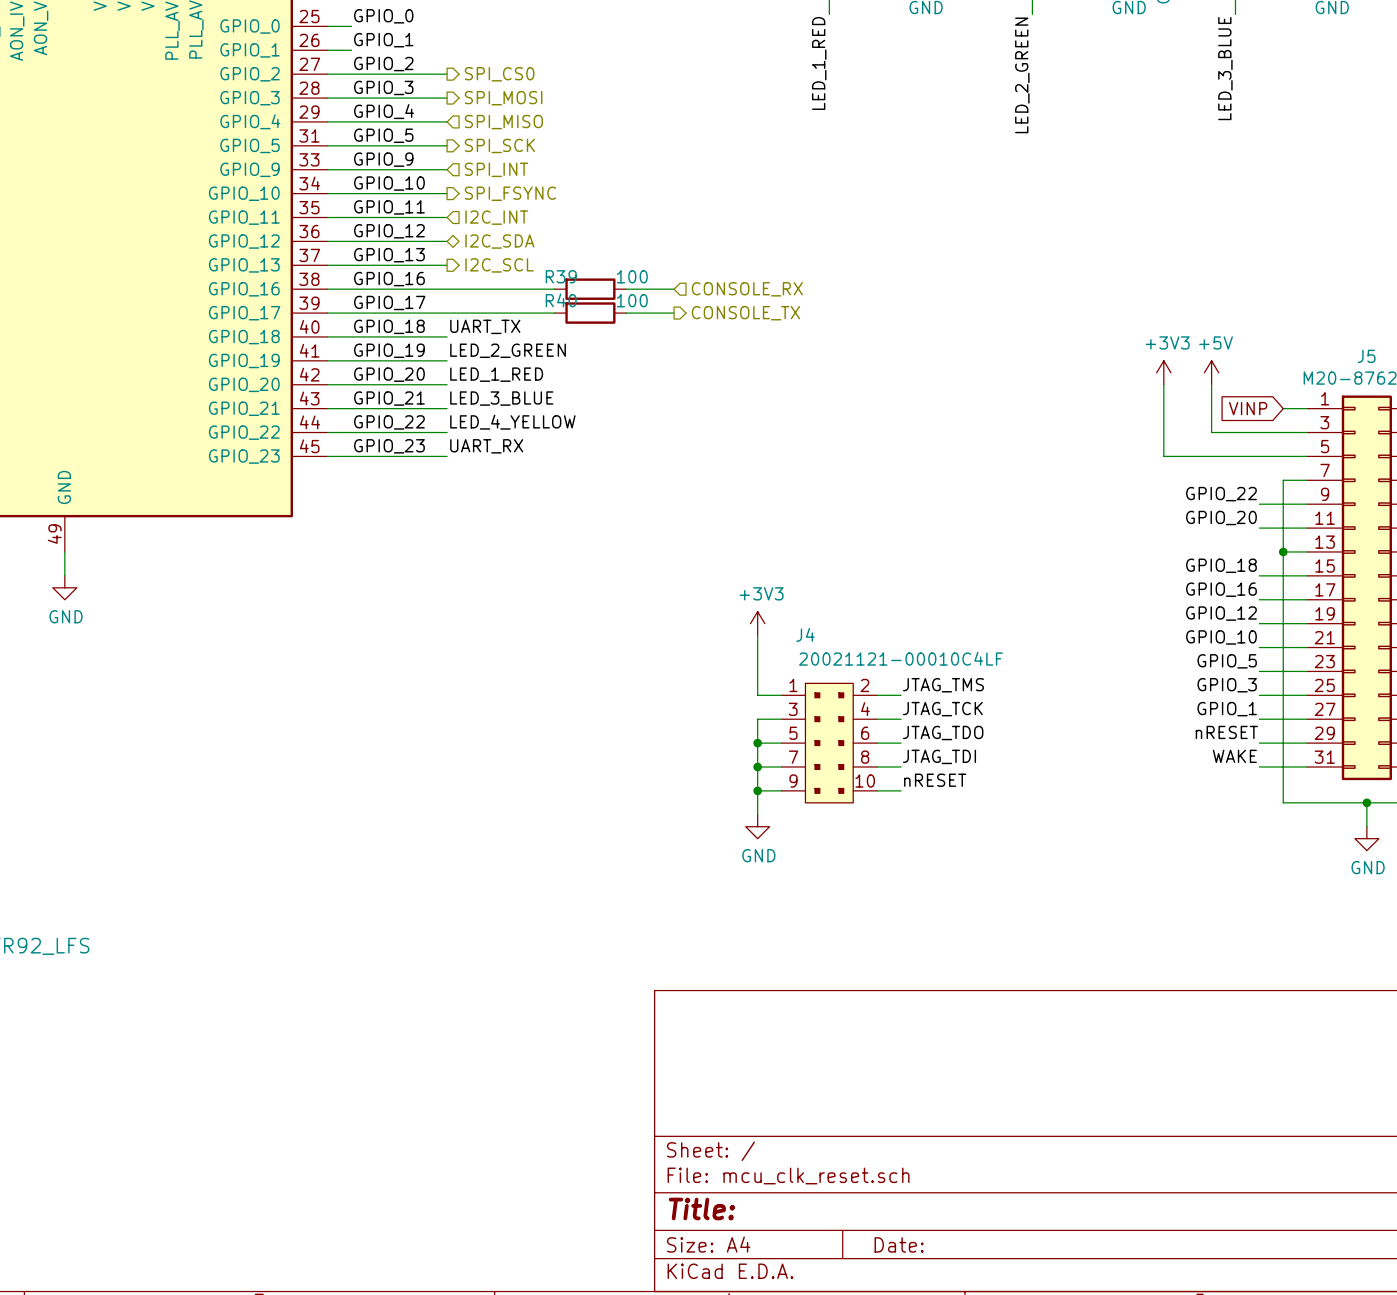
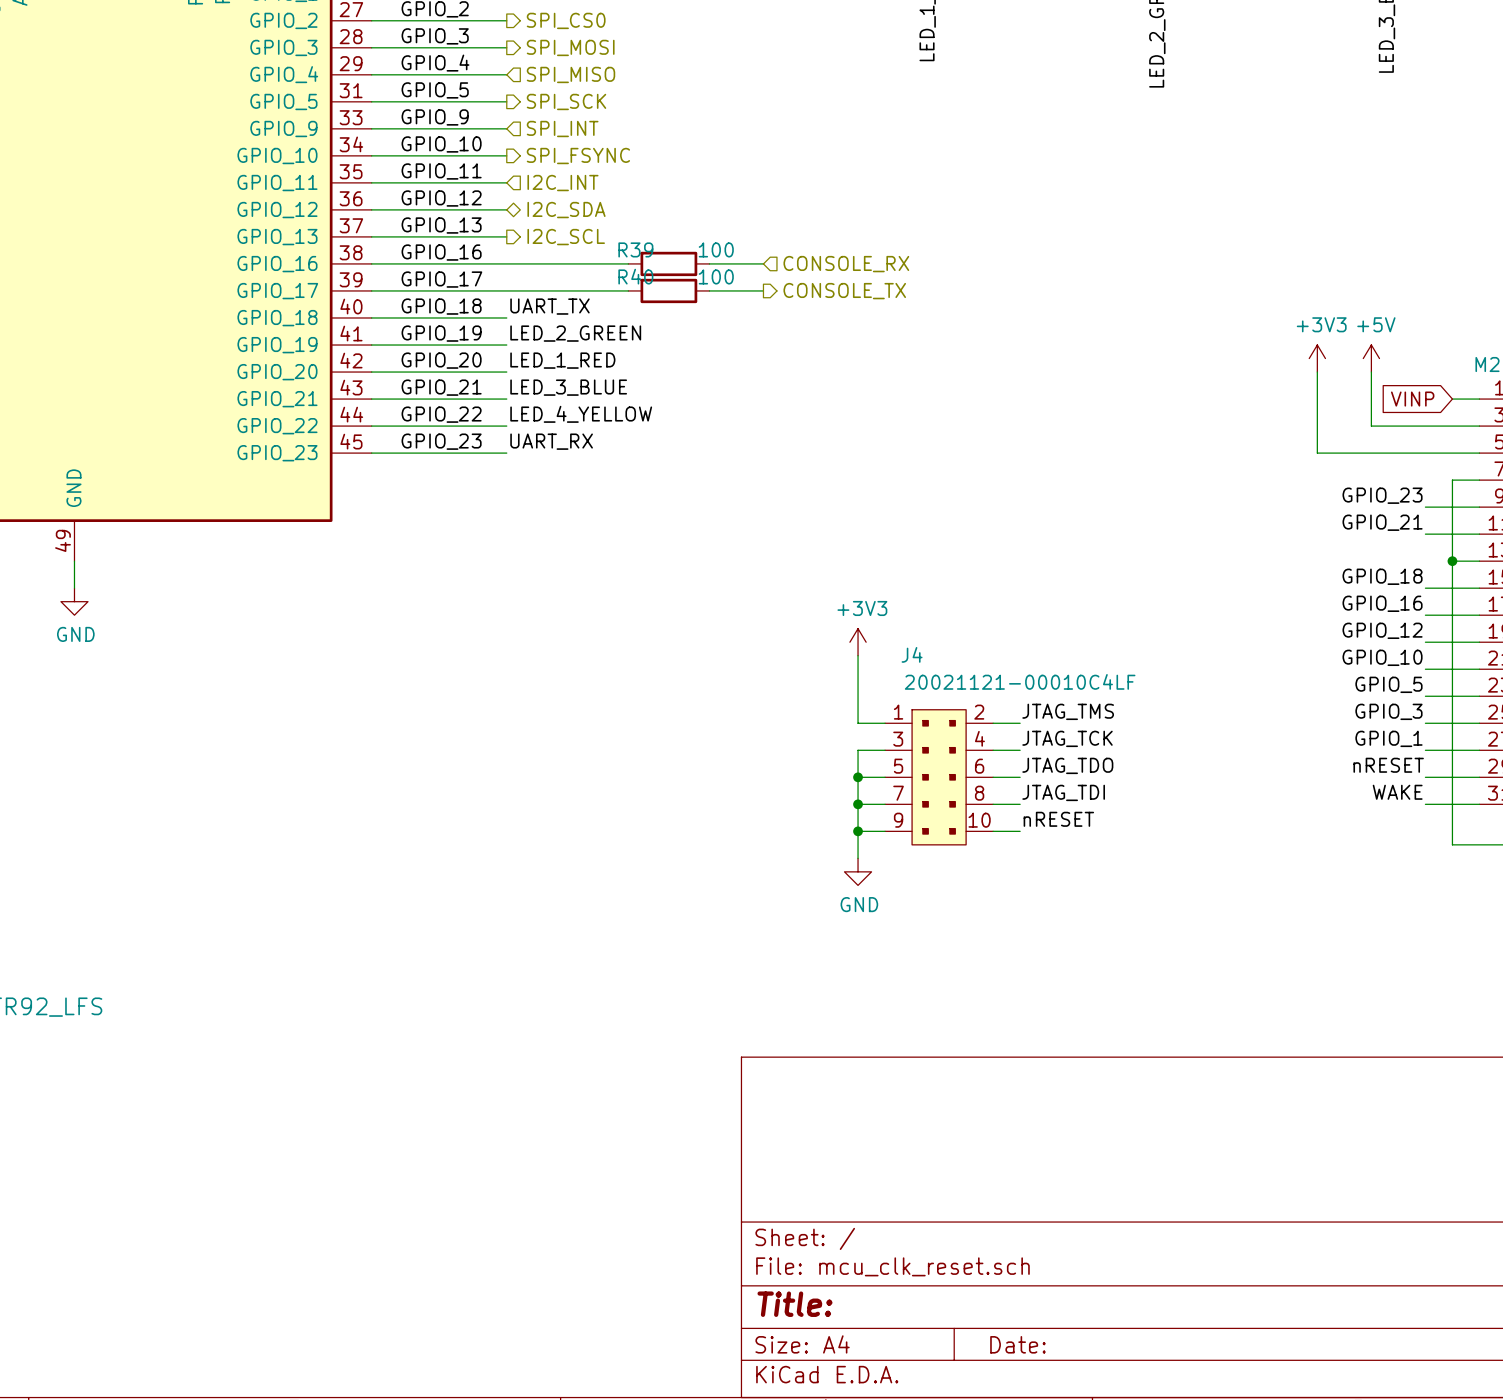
label: GPIO_22 (1221, 494) -> GPIO_23 (1382, 495)
label: GPIO_20 (1221, 517) -> GPIO_21 (1382, 522)

